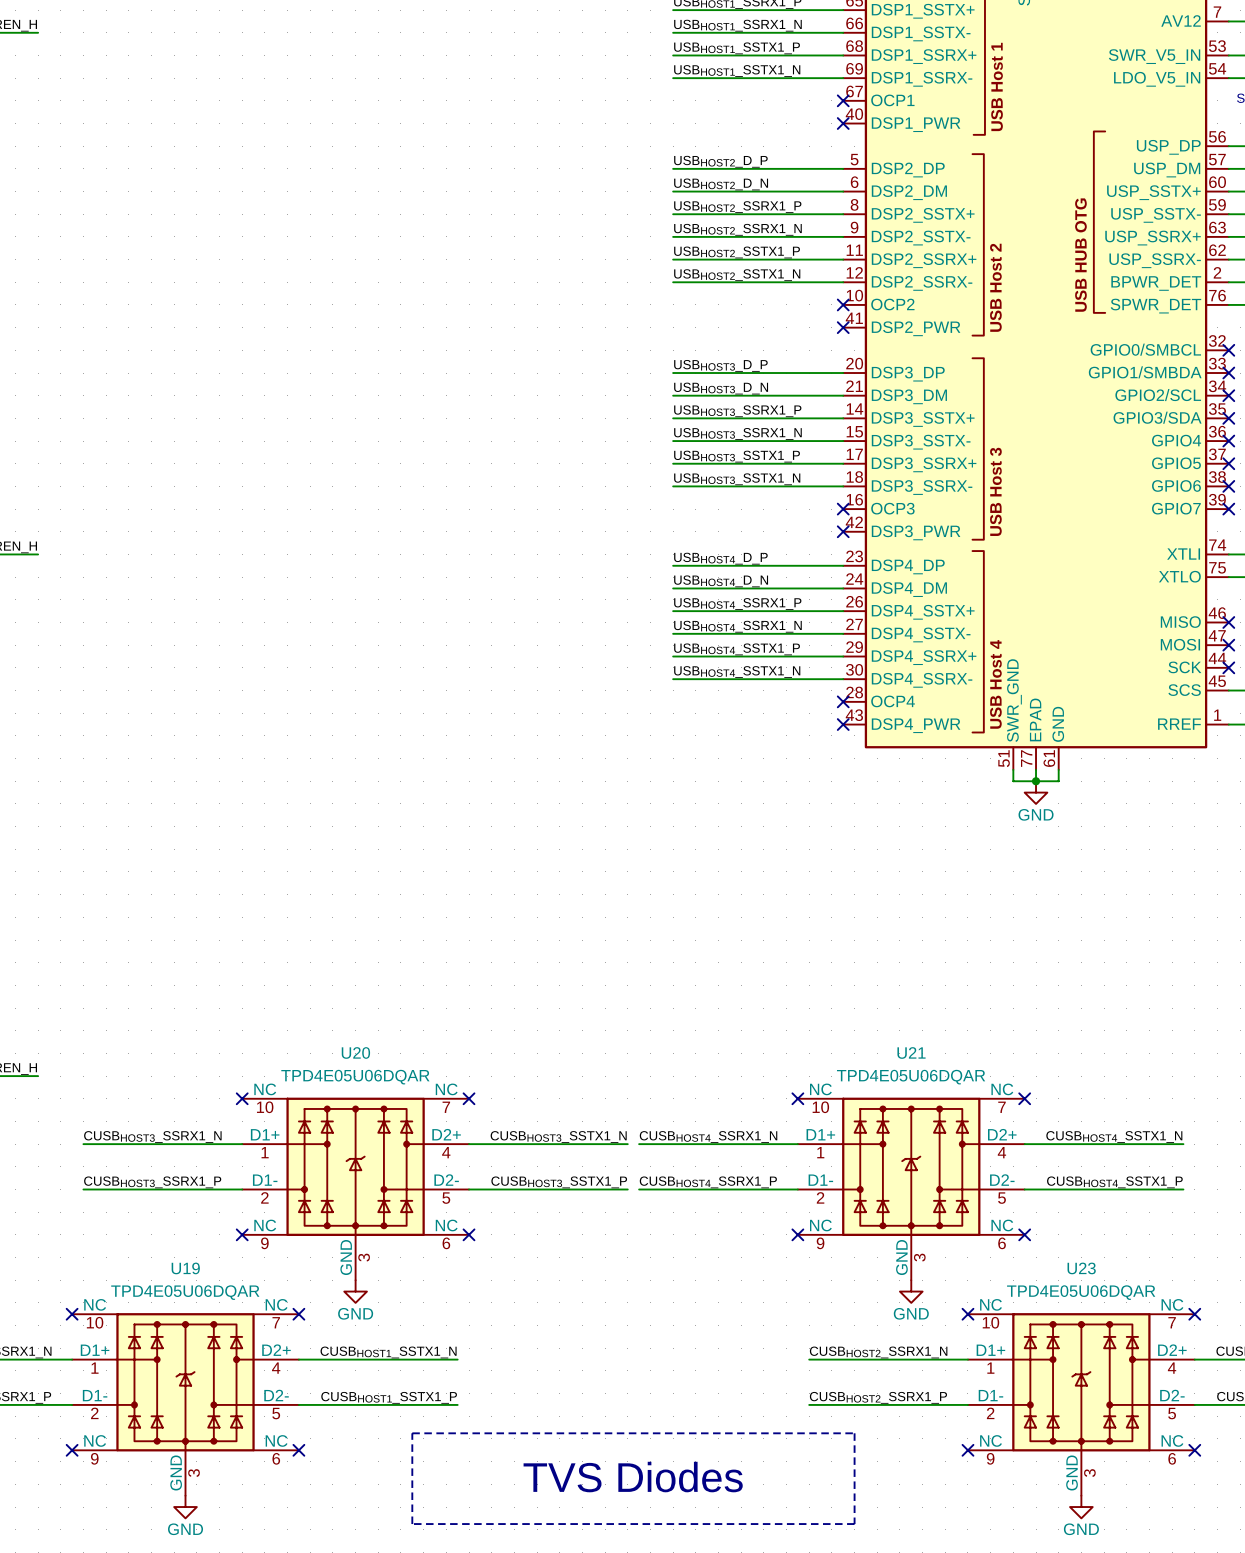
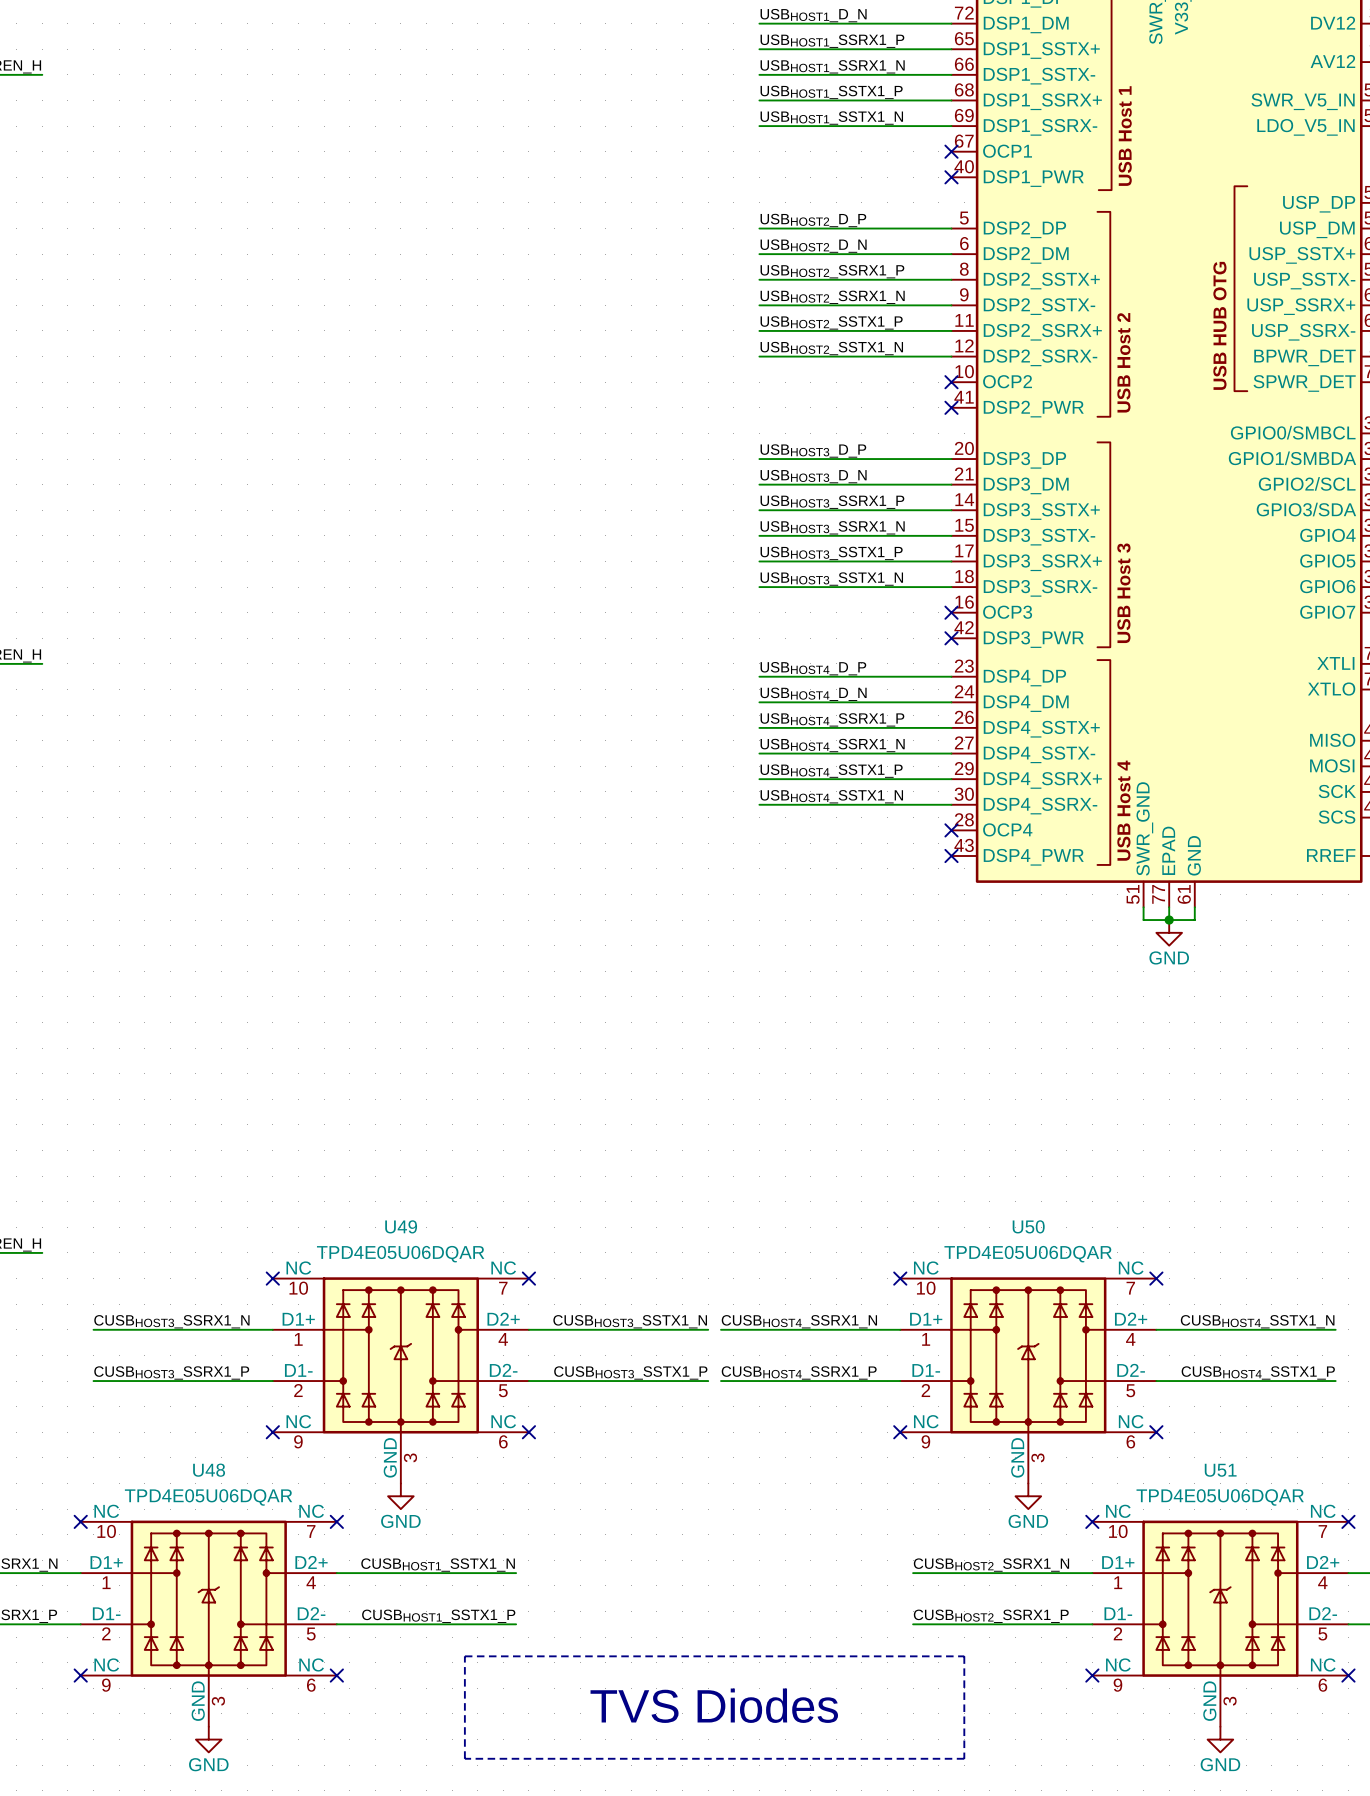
U20 name: U20 (355, 1052) -> U49 (401, 1226)
U21 name: U21 (911, 1052) -> U50 (1028, 1226)
U19 name: U19 (185, 1268) -> U48 (209, 1470)
U23 name: U23 (1081, 1268) -> U51 (1220, 1470)

